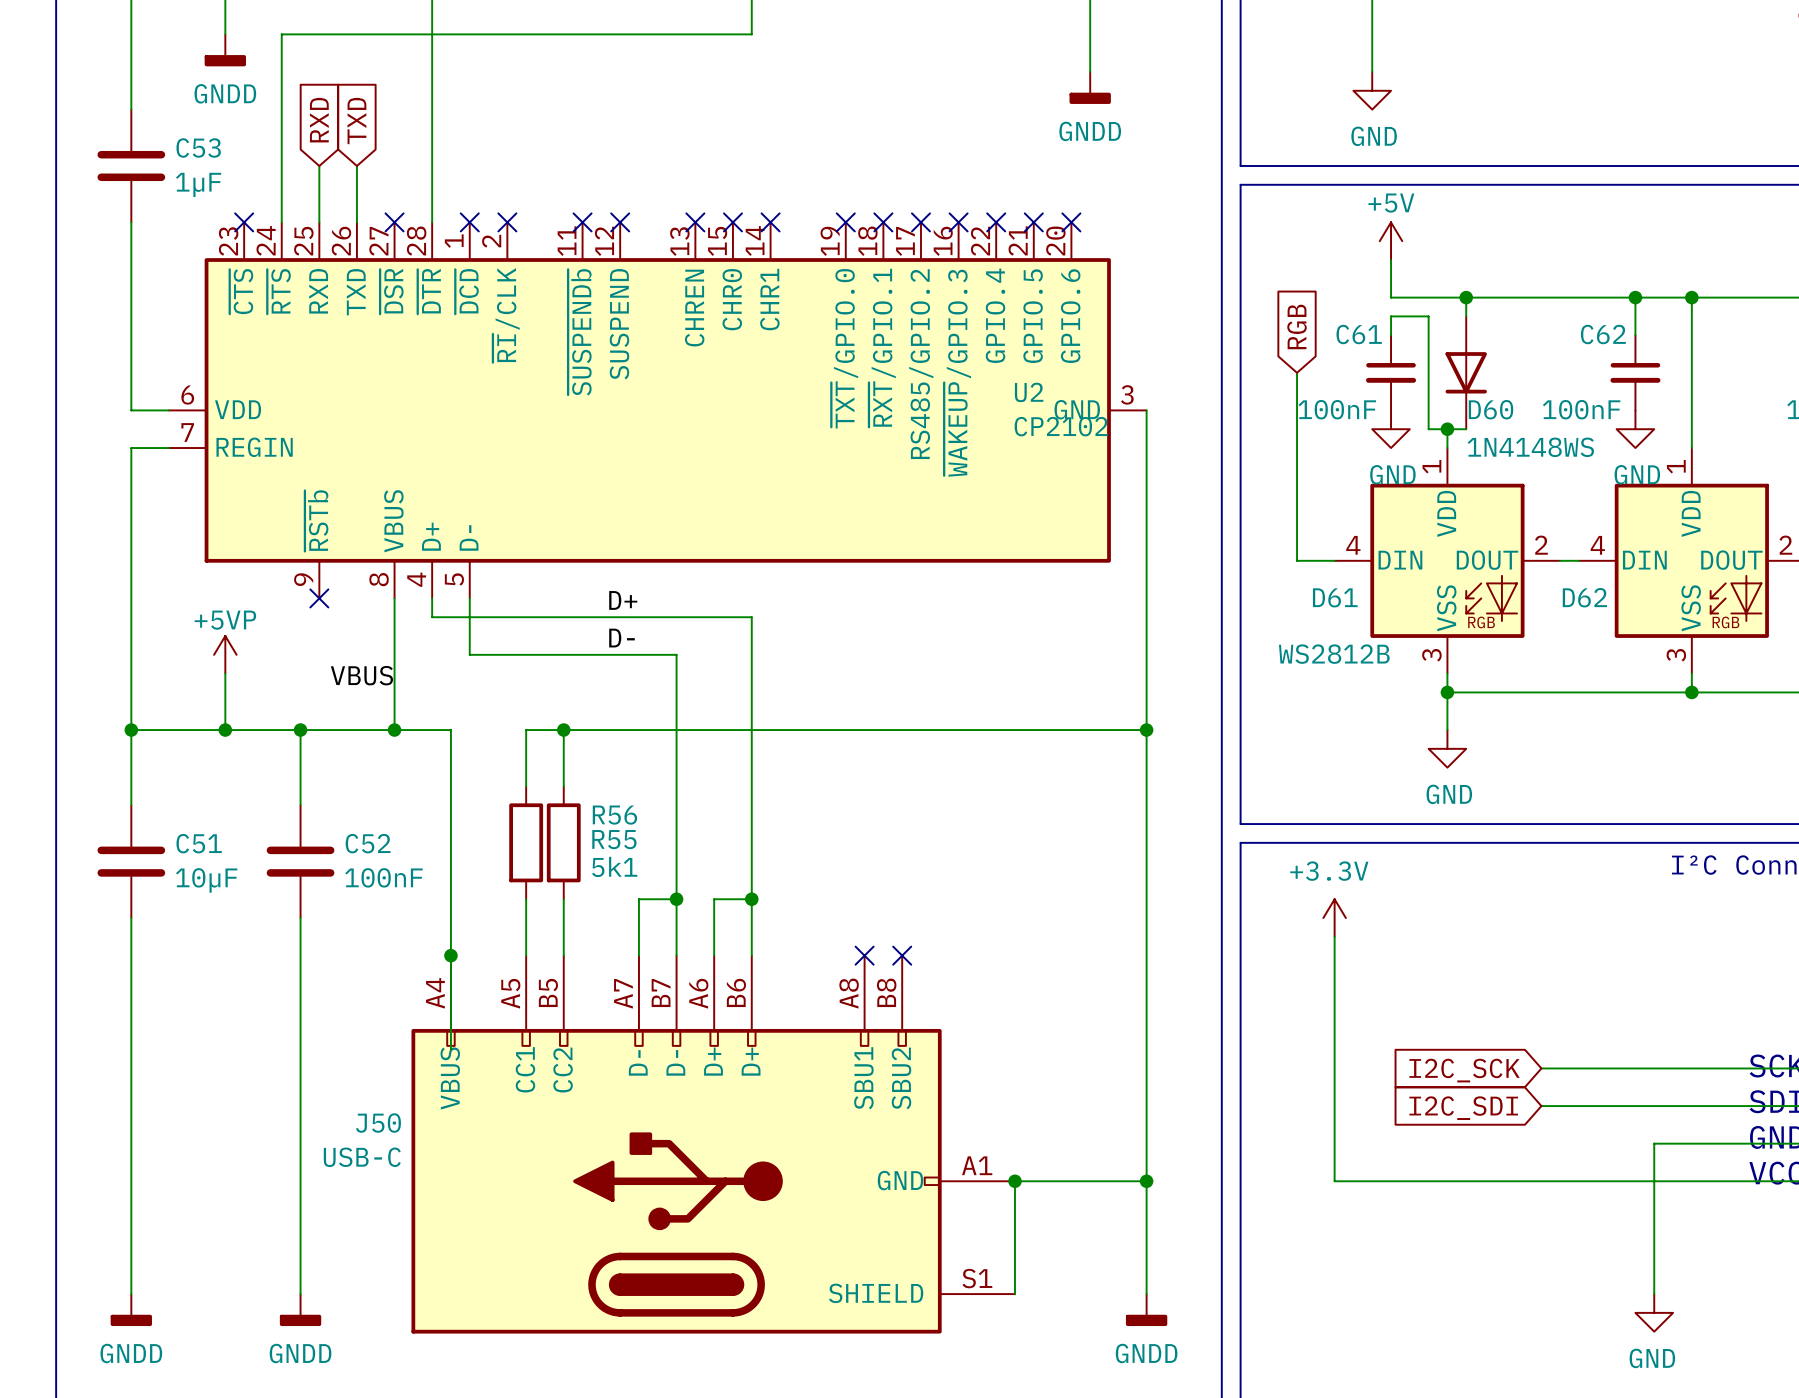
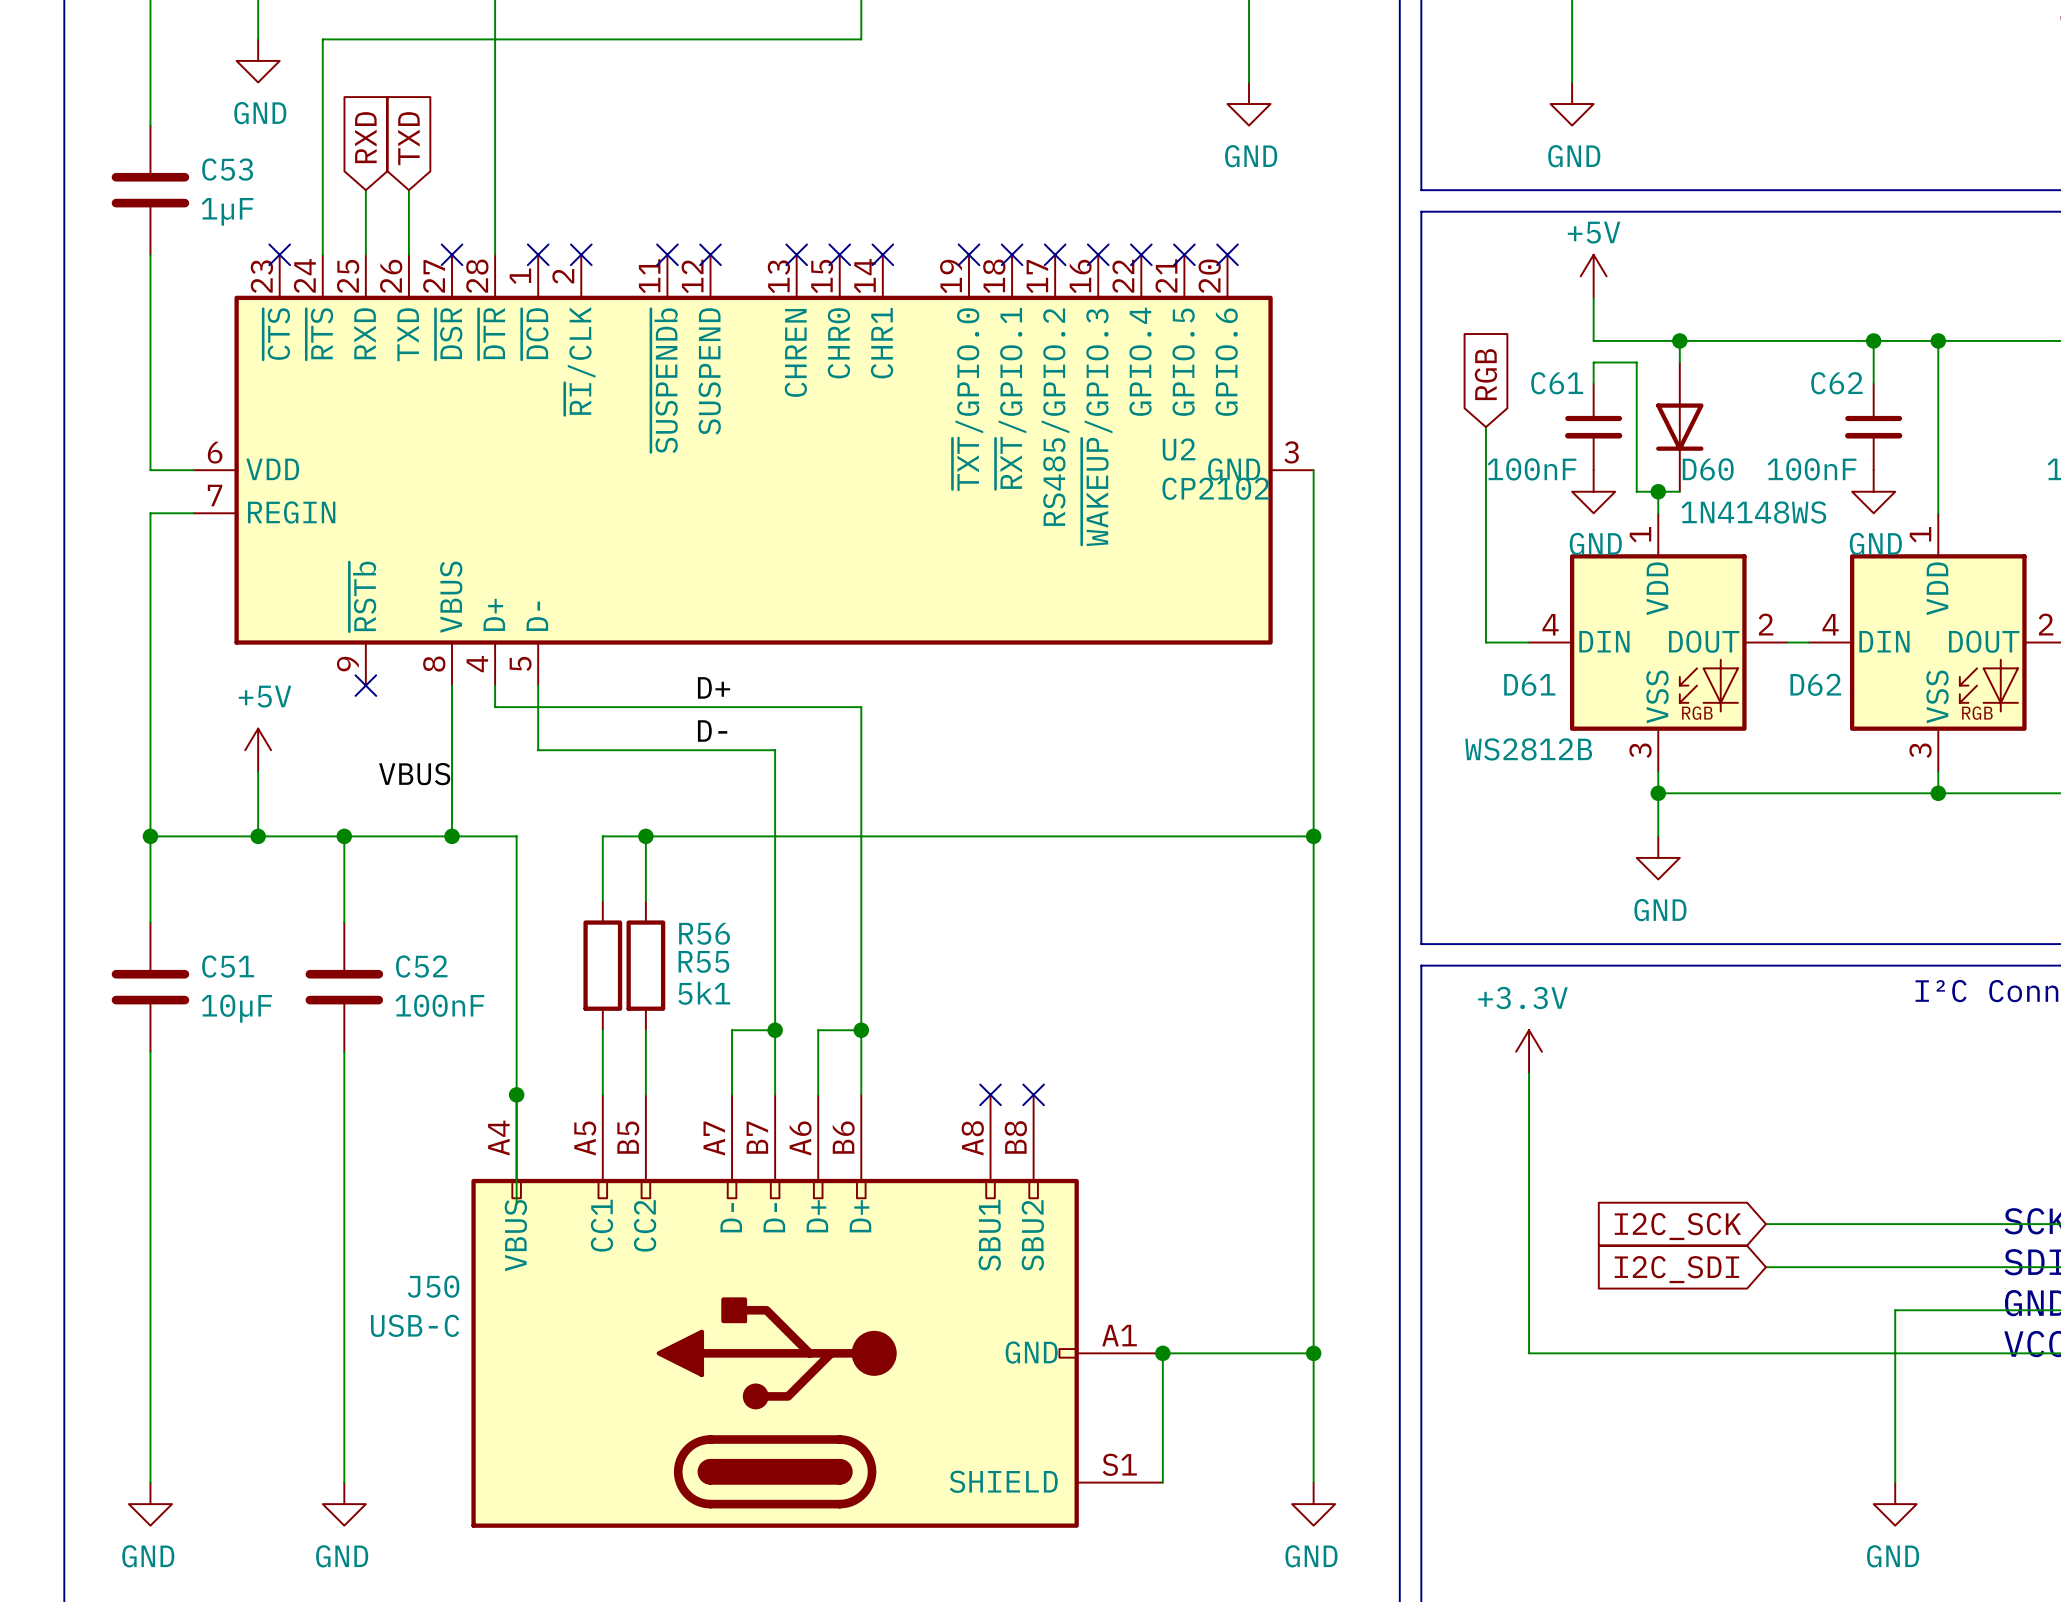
power symbol: GNDD (225, 50) -> GND (258, 60)
power symbol: GNDD (1090, 87) -> GND (1249, 104)
power symbol: +5VP (225, 654) -> +5V (258, 750)
power symbol: GNDD (131, 1310) -> GND (150, 1504)
power symbol: GNDD (300, 1310) -> GND (344, 1504)
power symbol: GNDD (1146, 1310) -> GND (1313, 1504)

